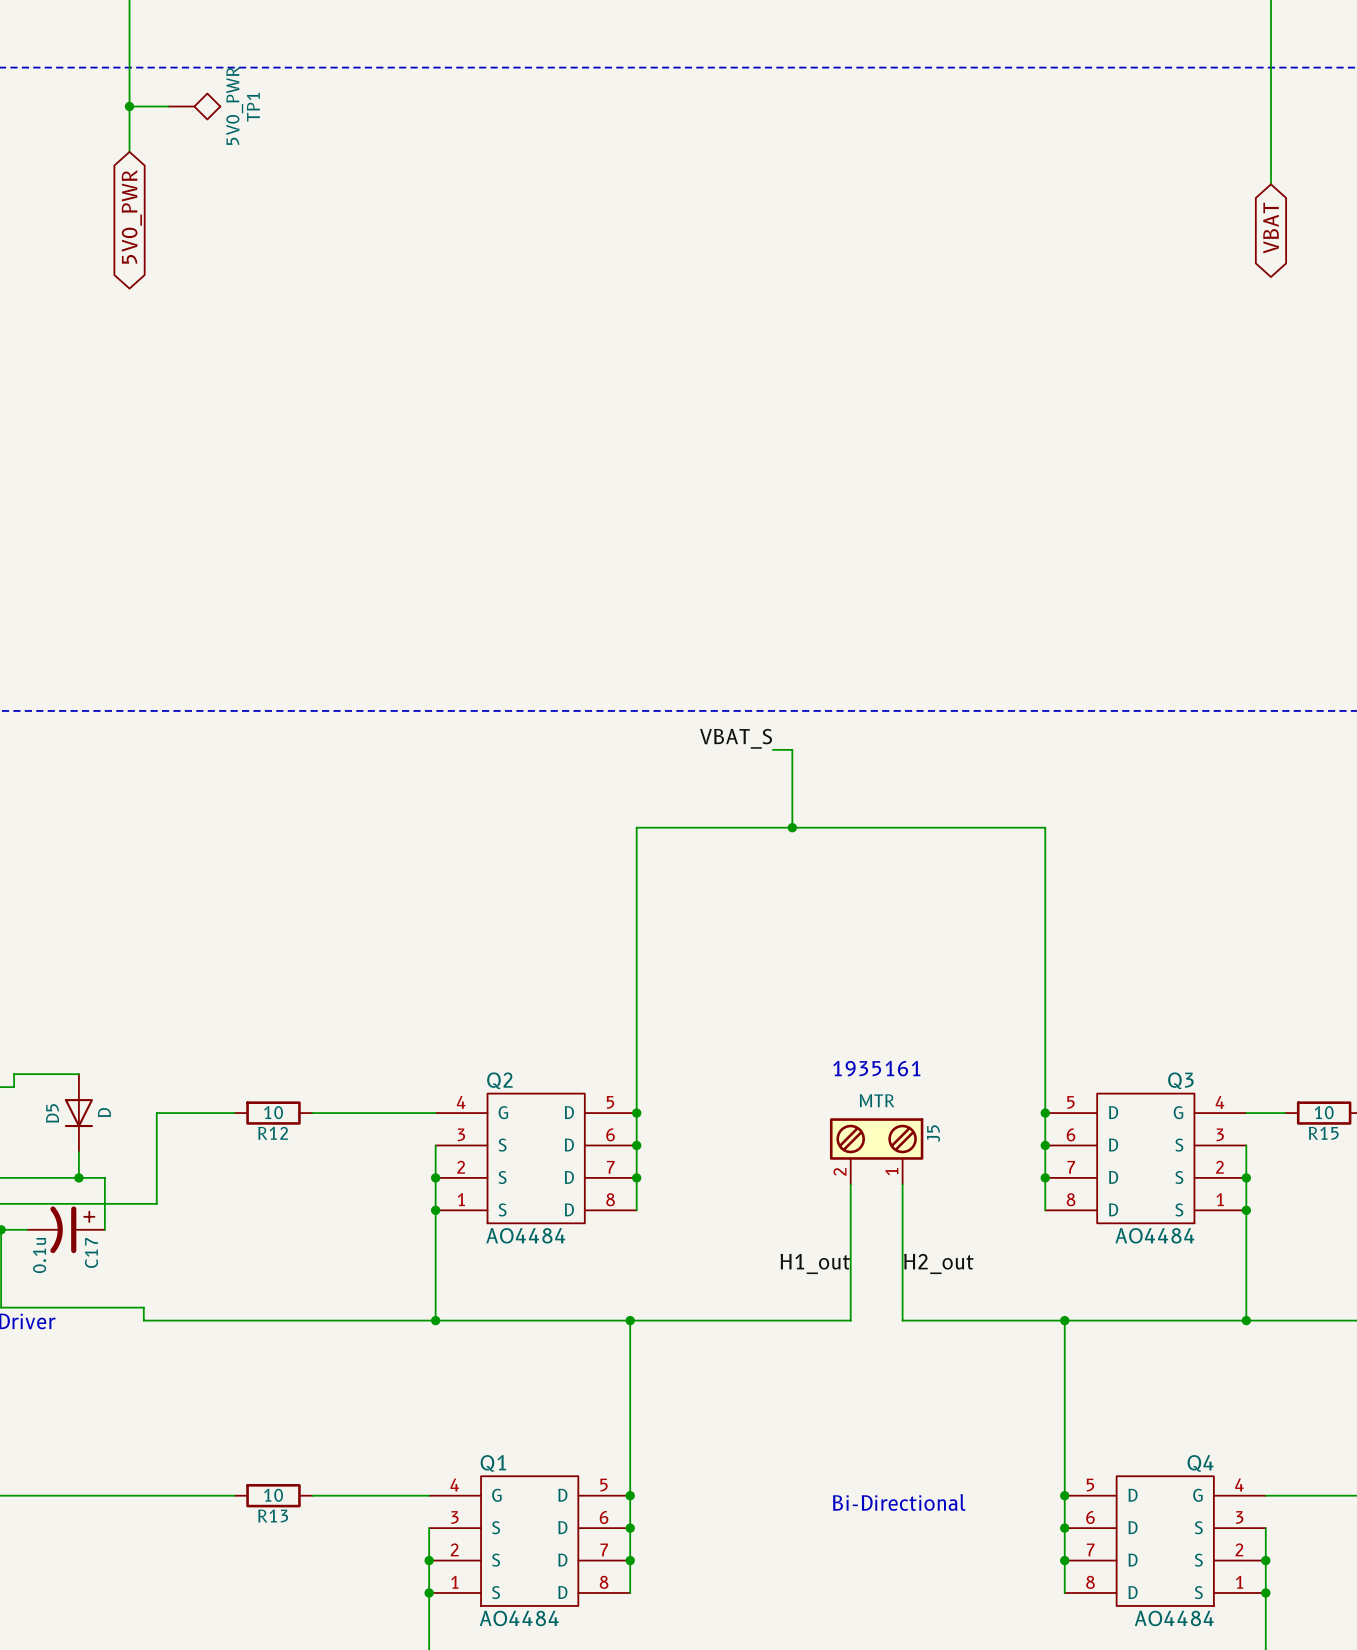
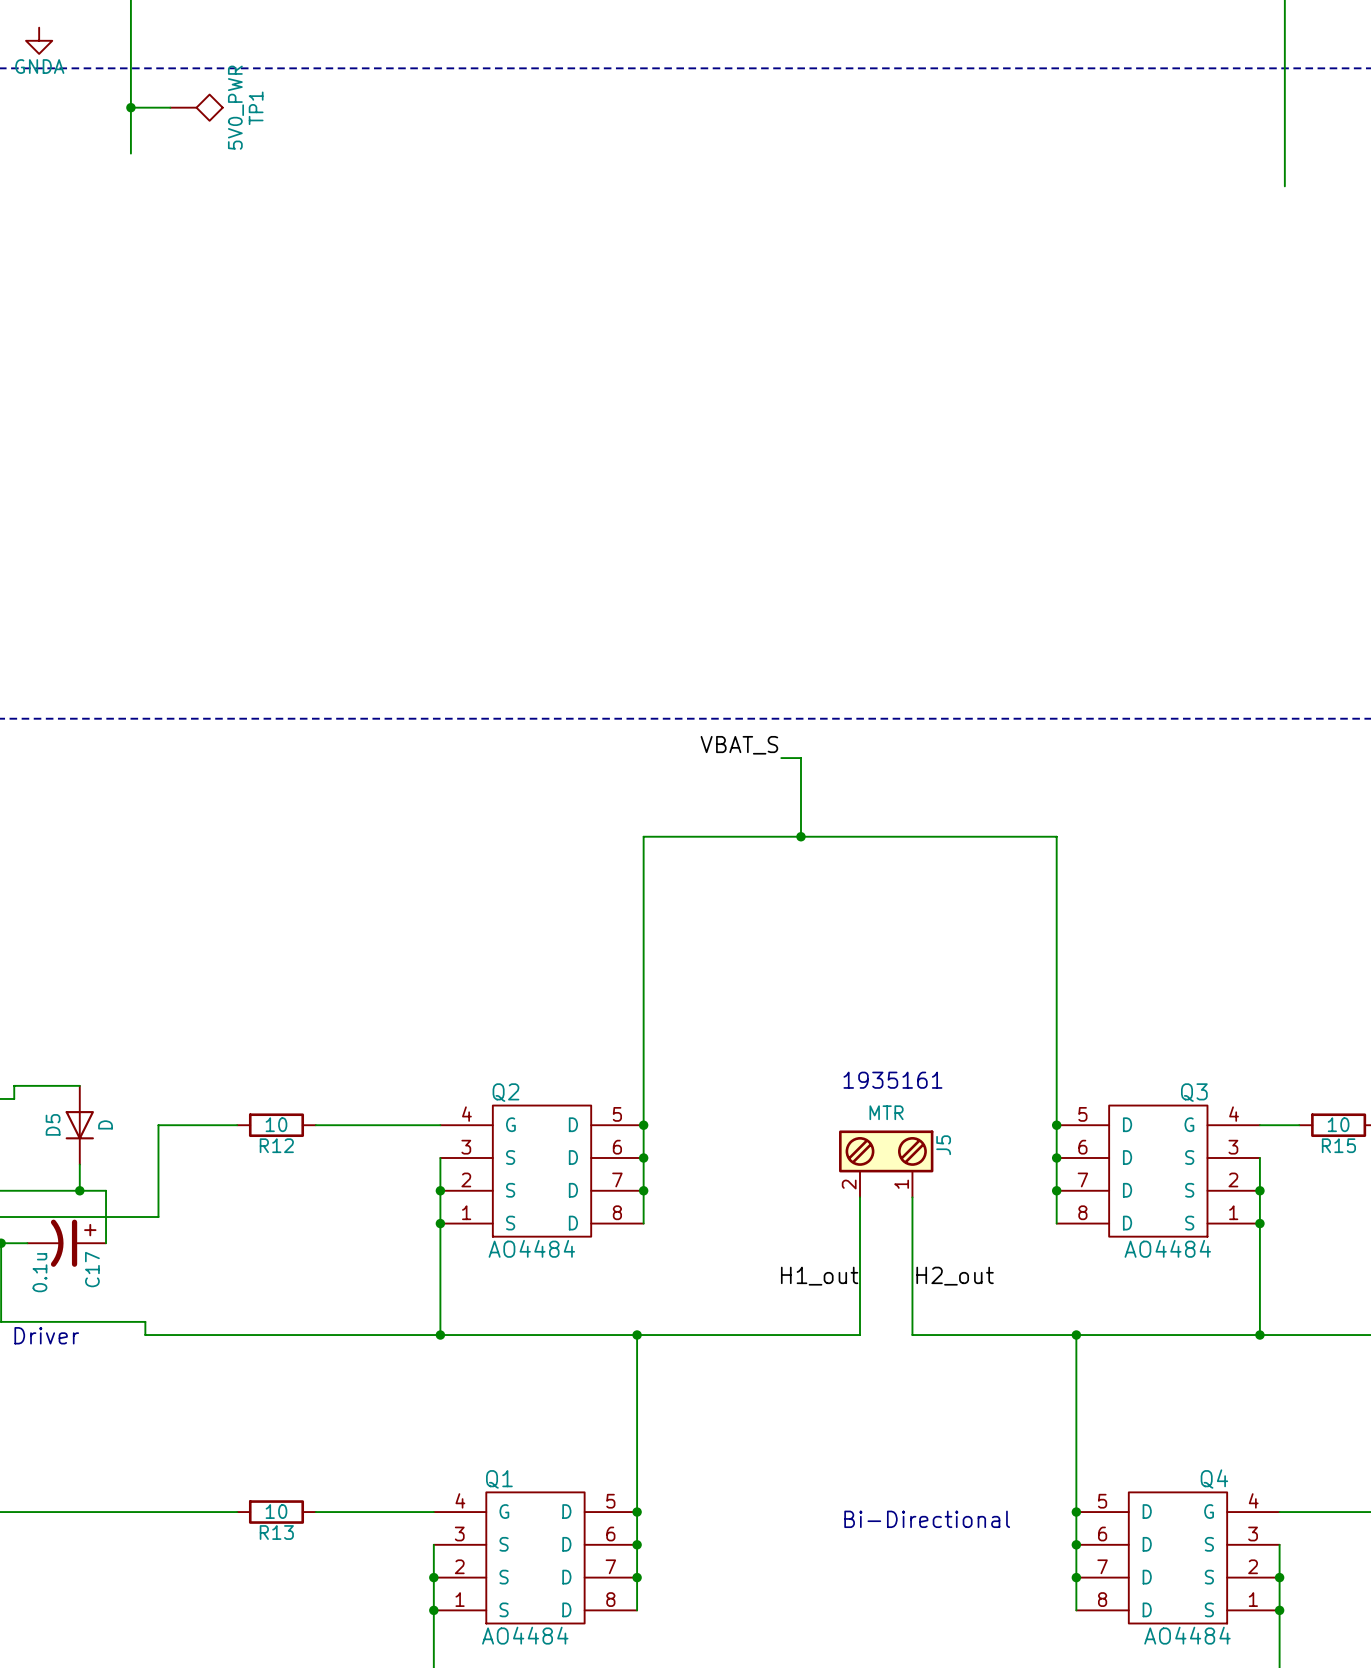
power symbol: none -> GNDA (39, 40)
global label: 5V0_PWR (131, 216) -> none
global label: VBAT (1271, 228) -> none

